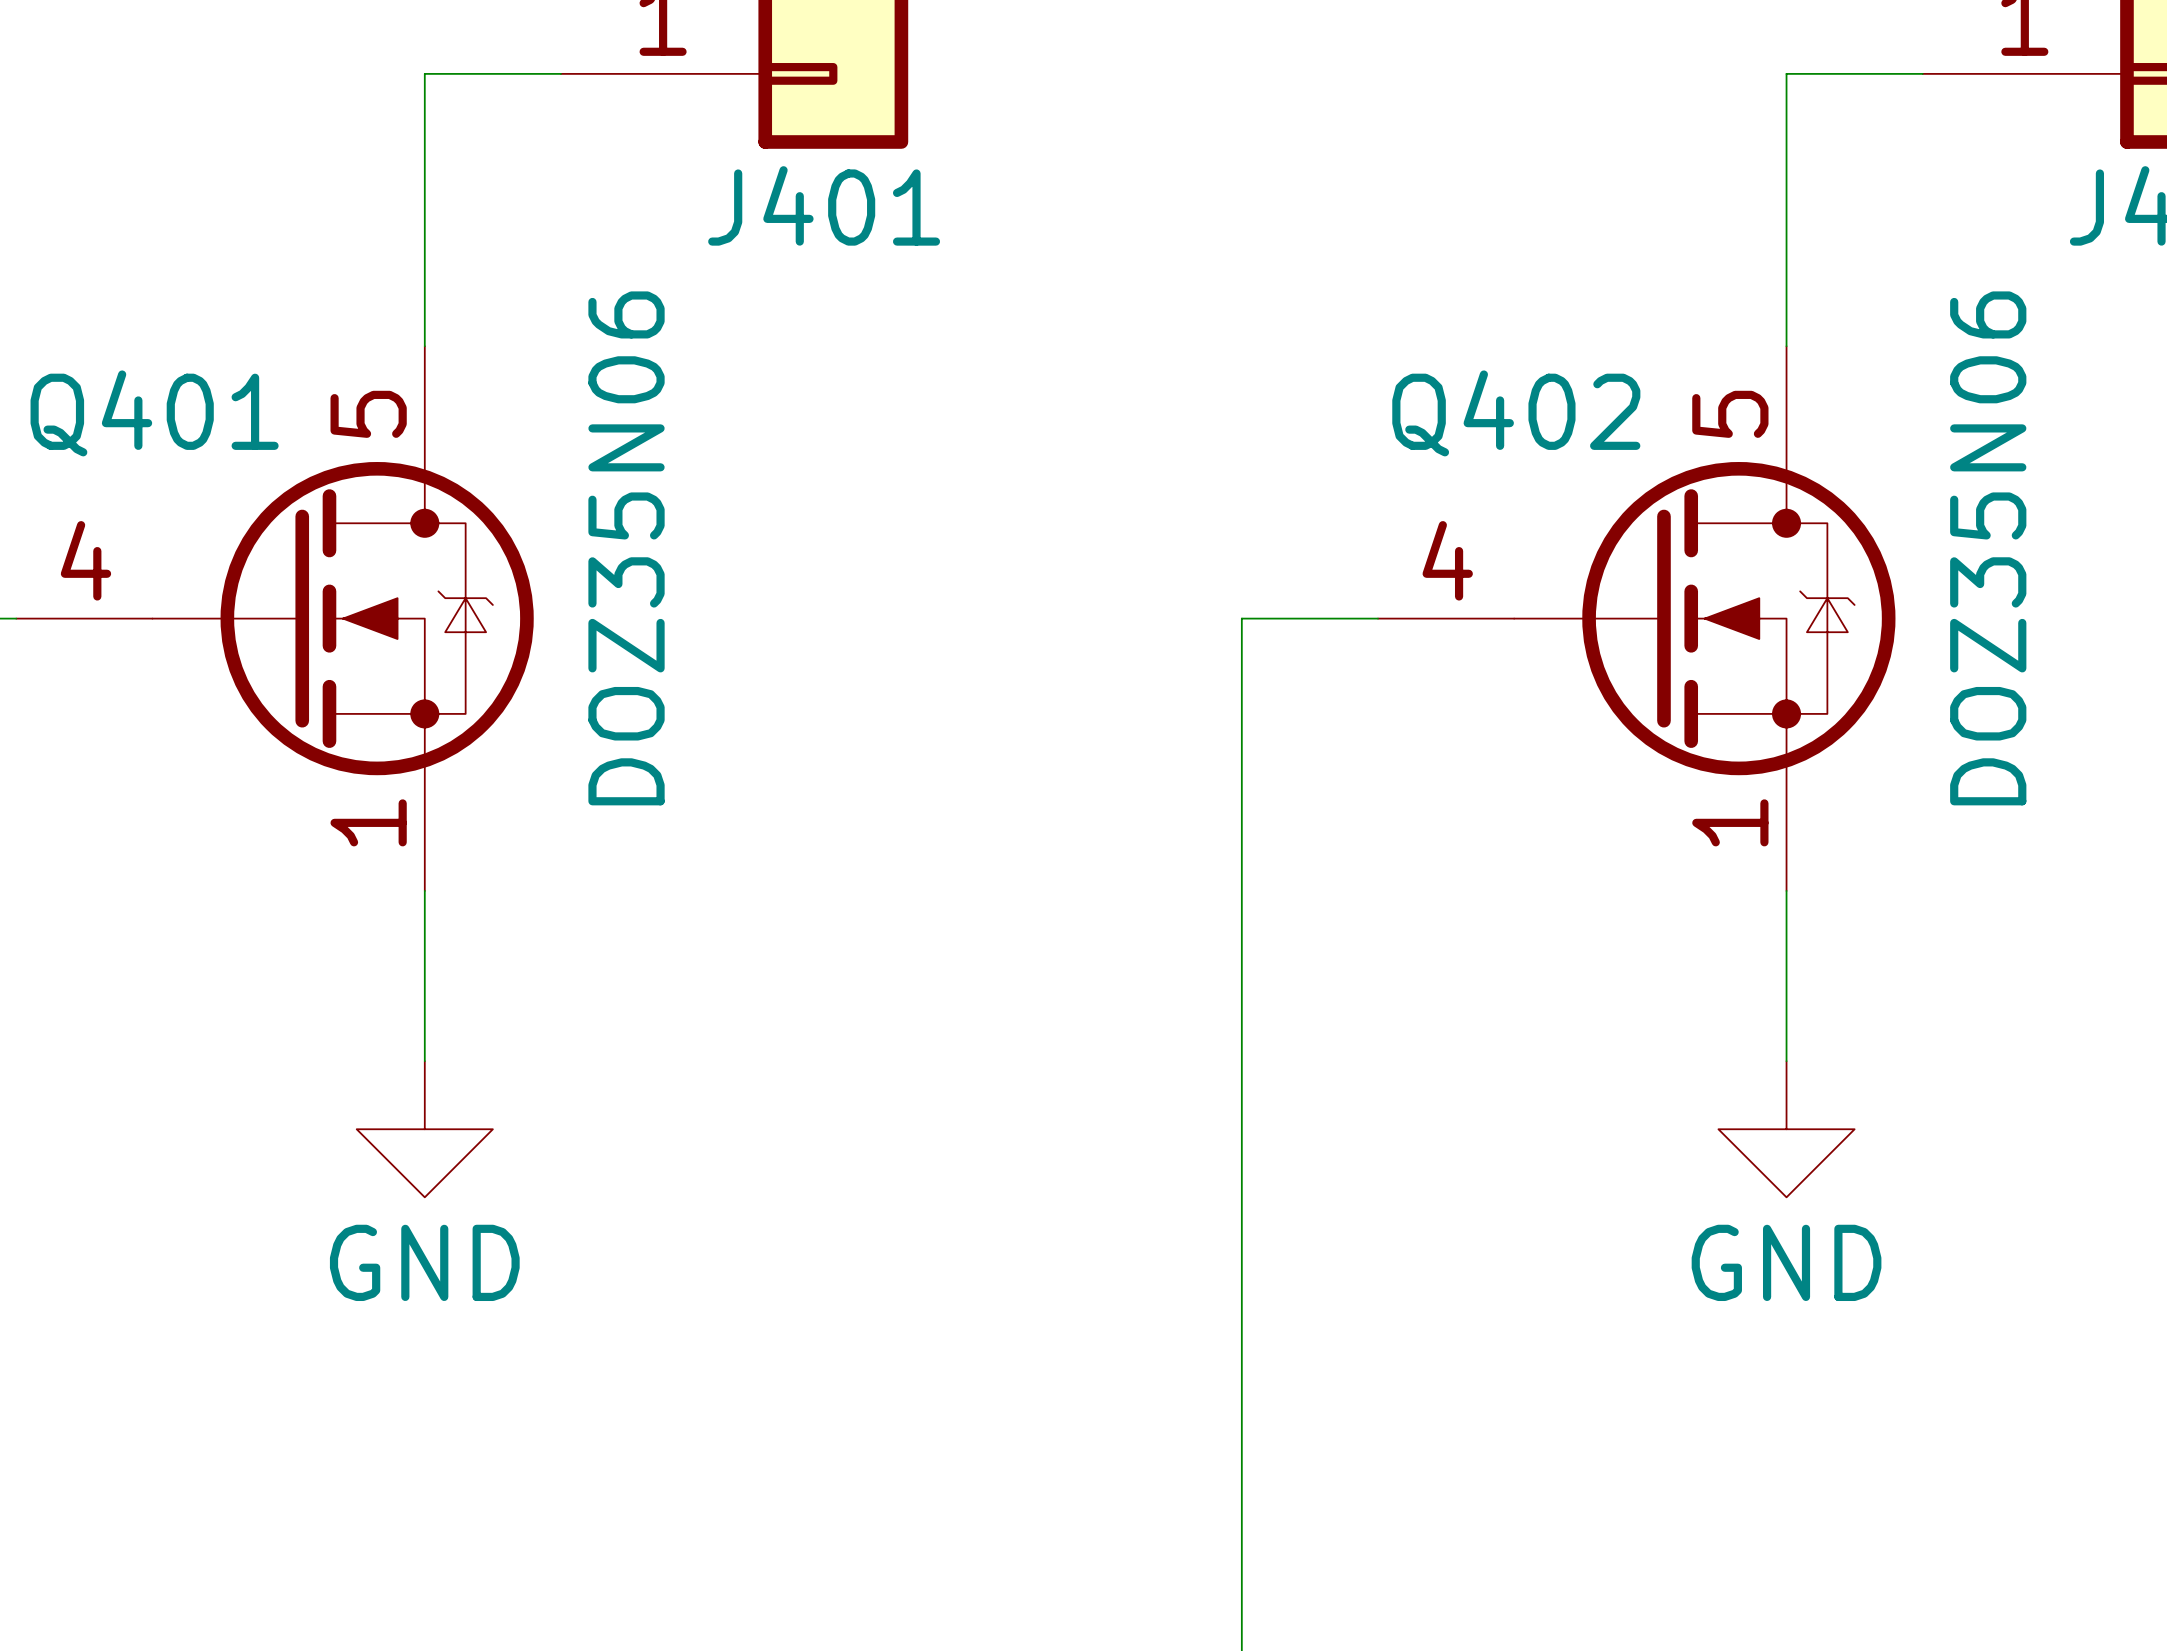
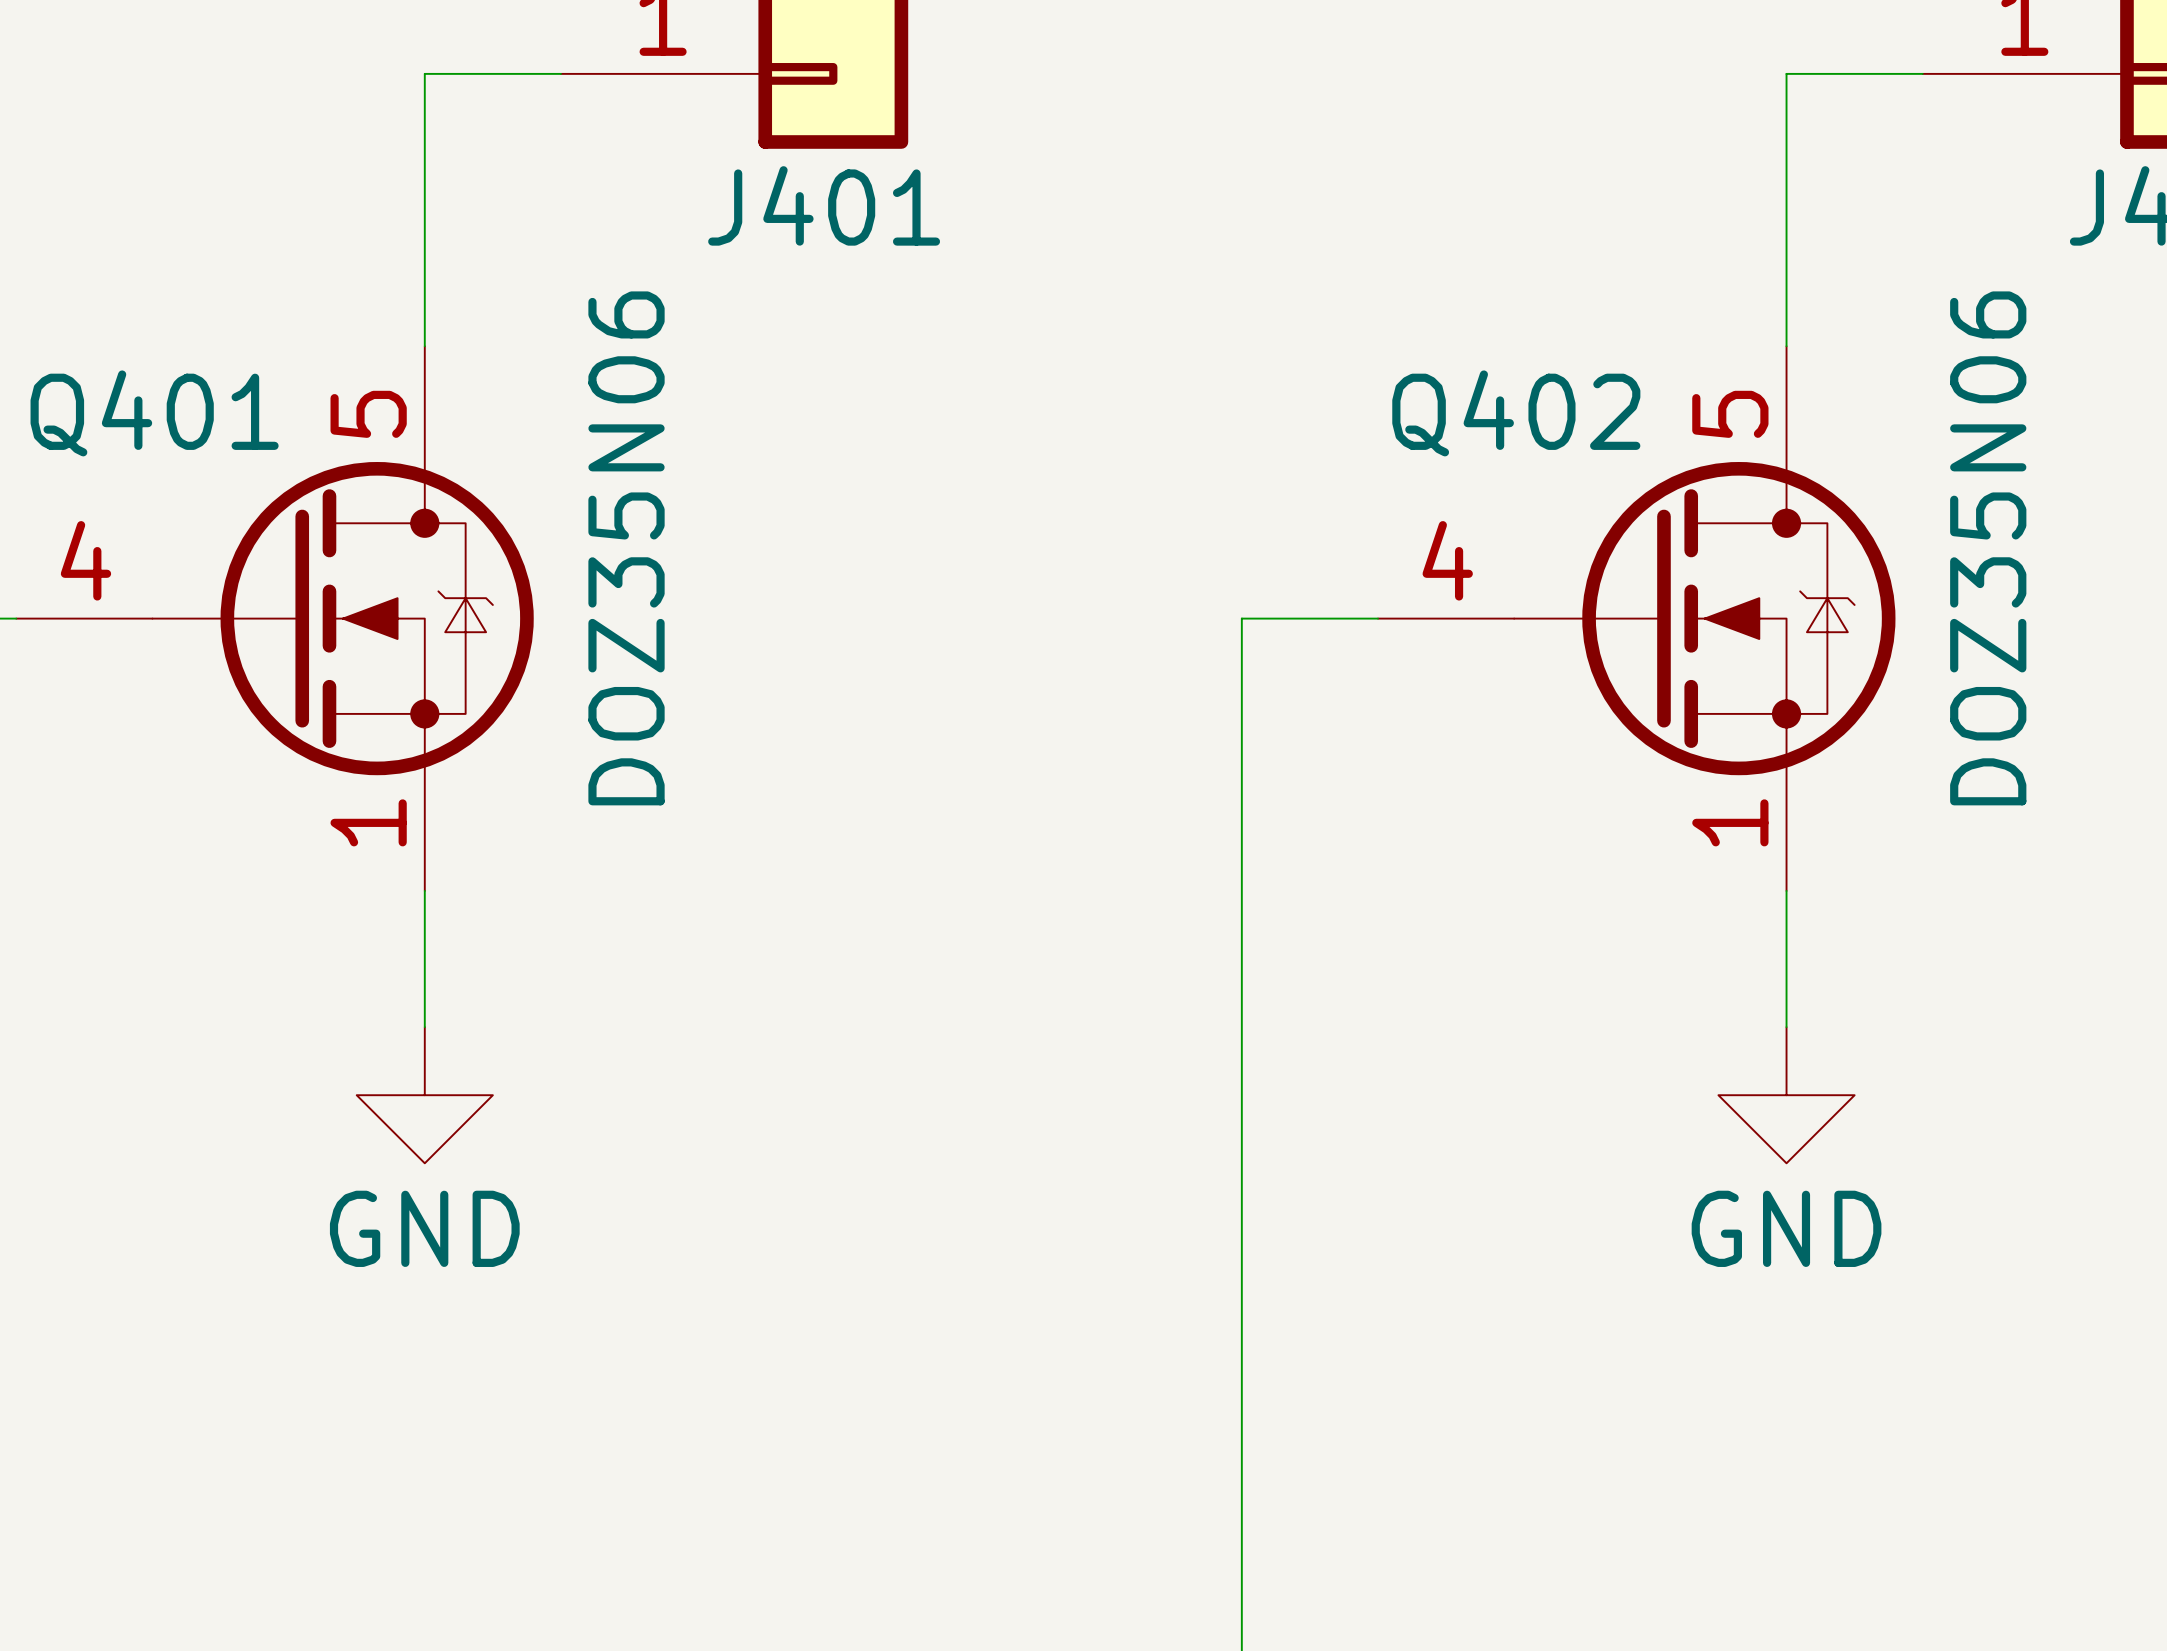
power symbol position: GND (424, 1129) -> GND (424, 1095)
power symbol position: GND (1786, 1129) -> GND (1786, 1095)

